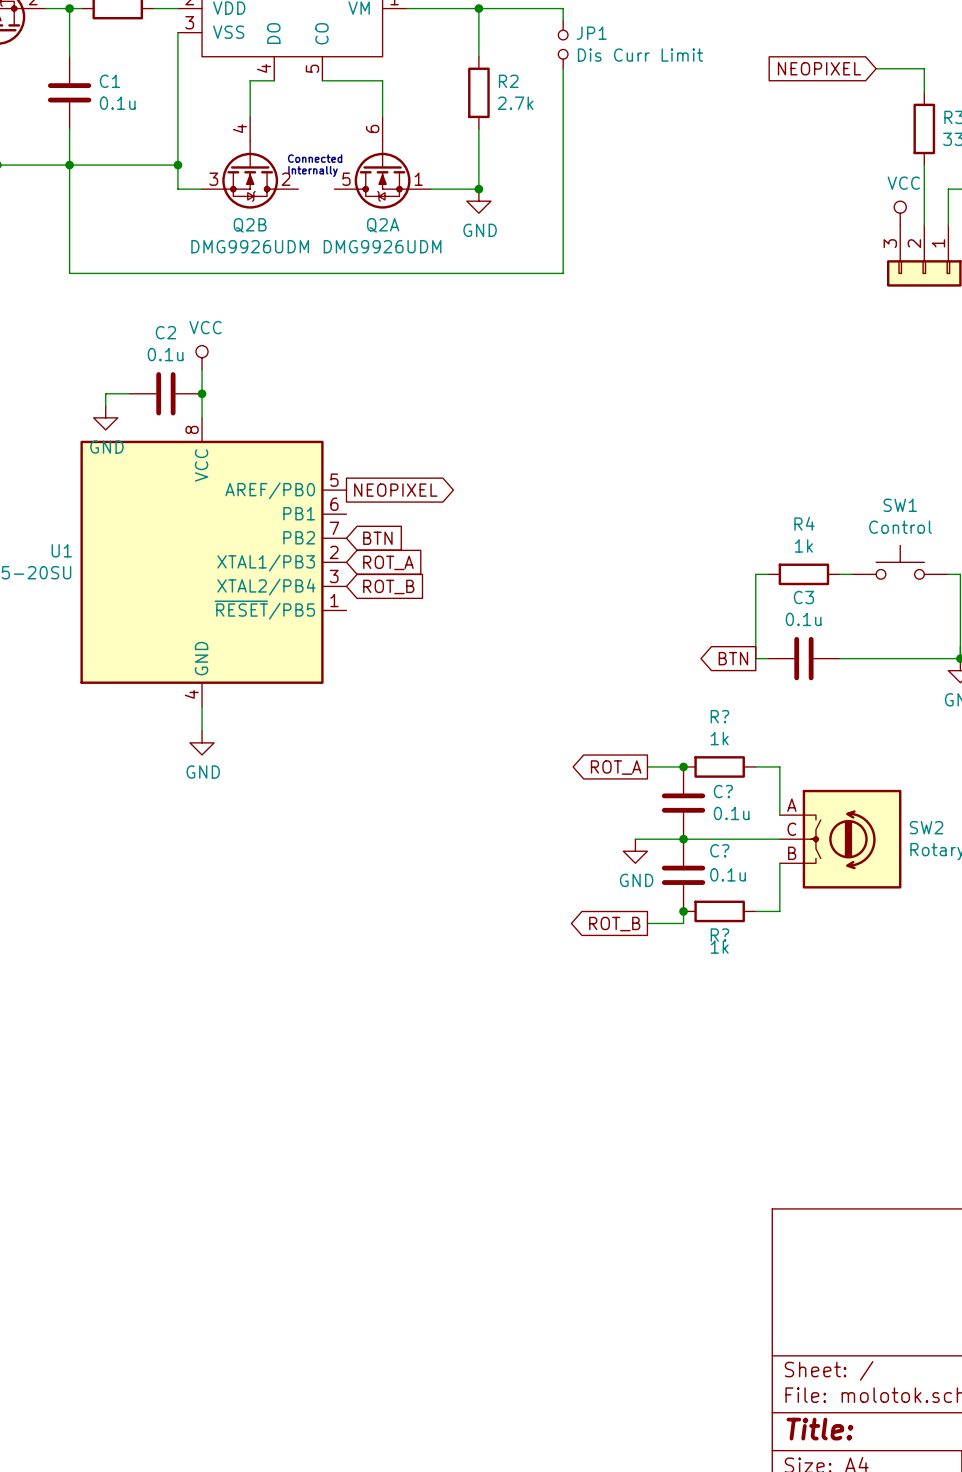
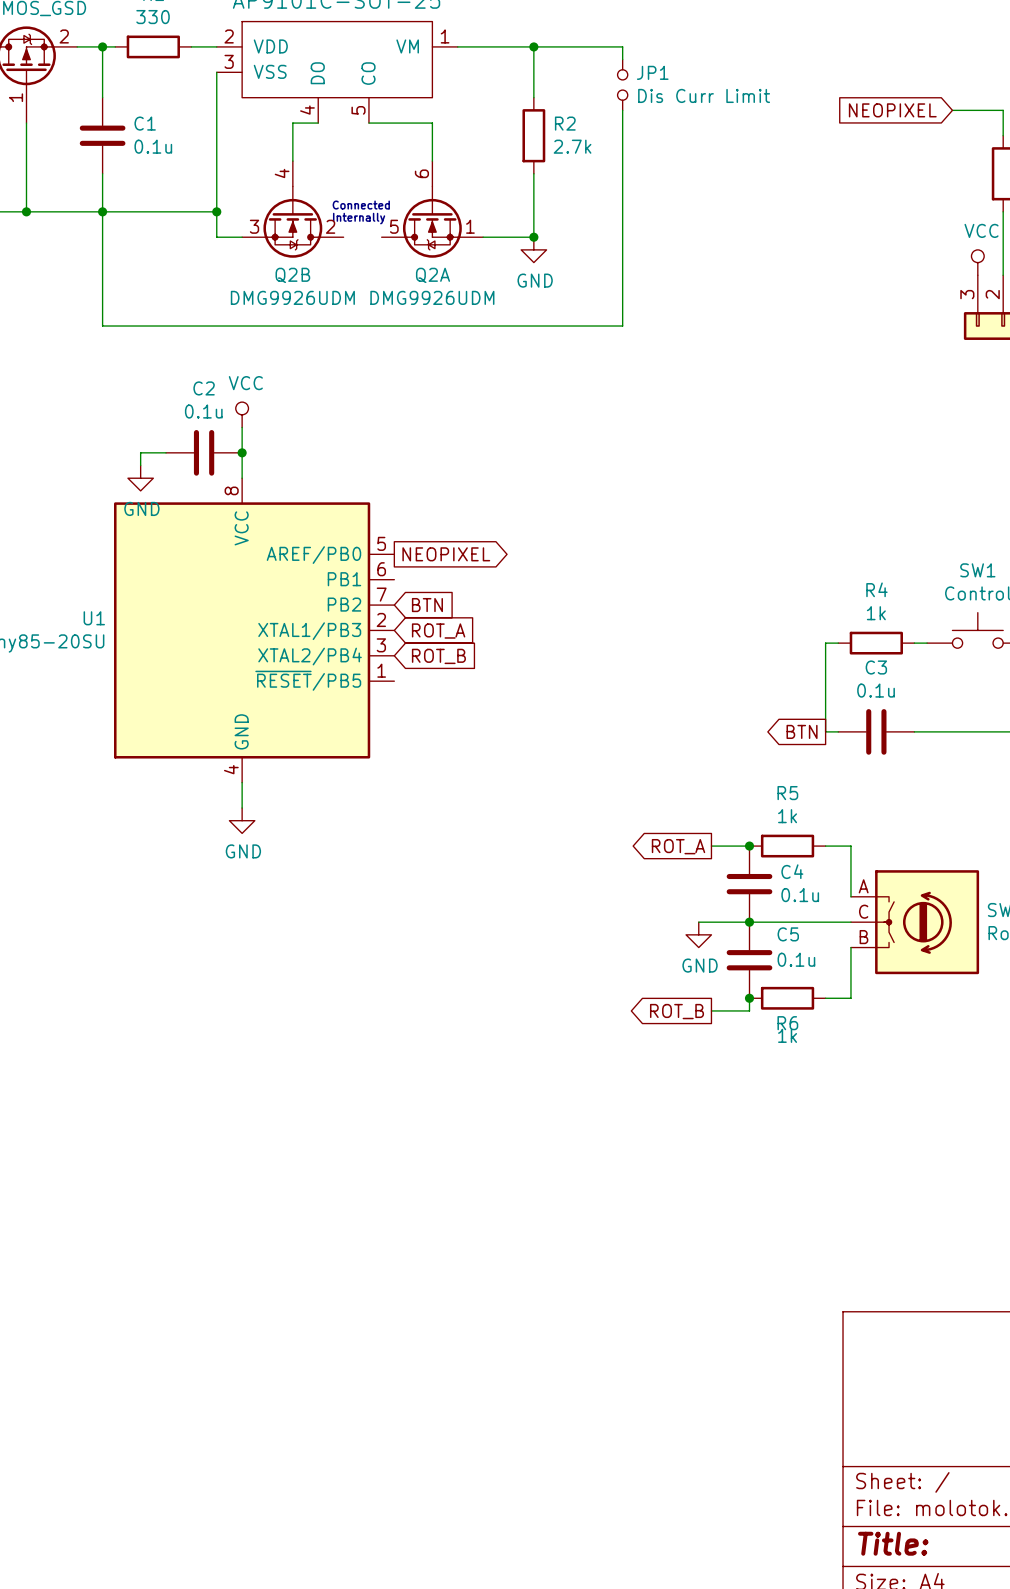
R? name: R? (719, 716) -> R5 (787, 793)
C? name: C? (723, 791) -> C4 (792, 871)
C? name: C? (719, 850) -> C5 (788, 934)
R? name: R? (719, 935) -> R6 (787, 1023)

